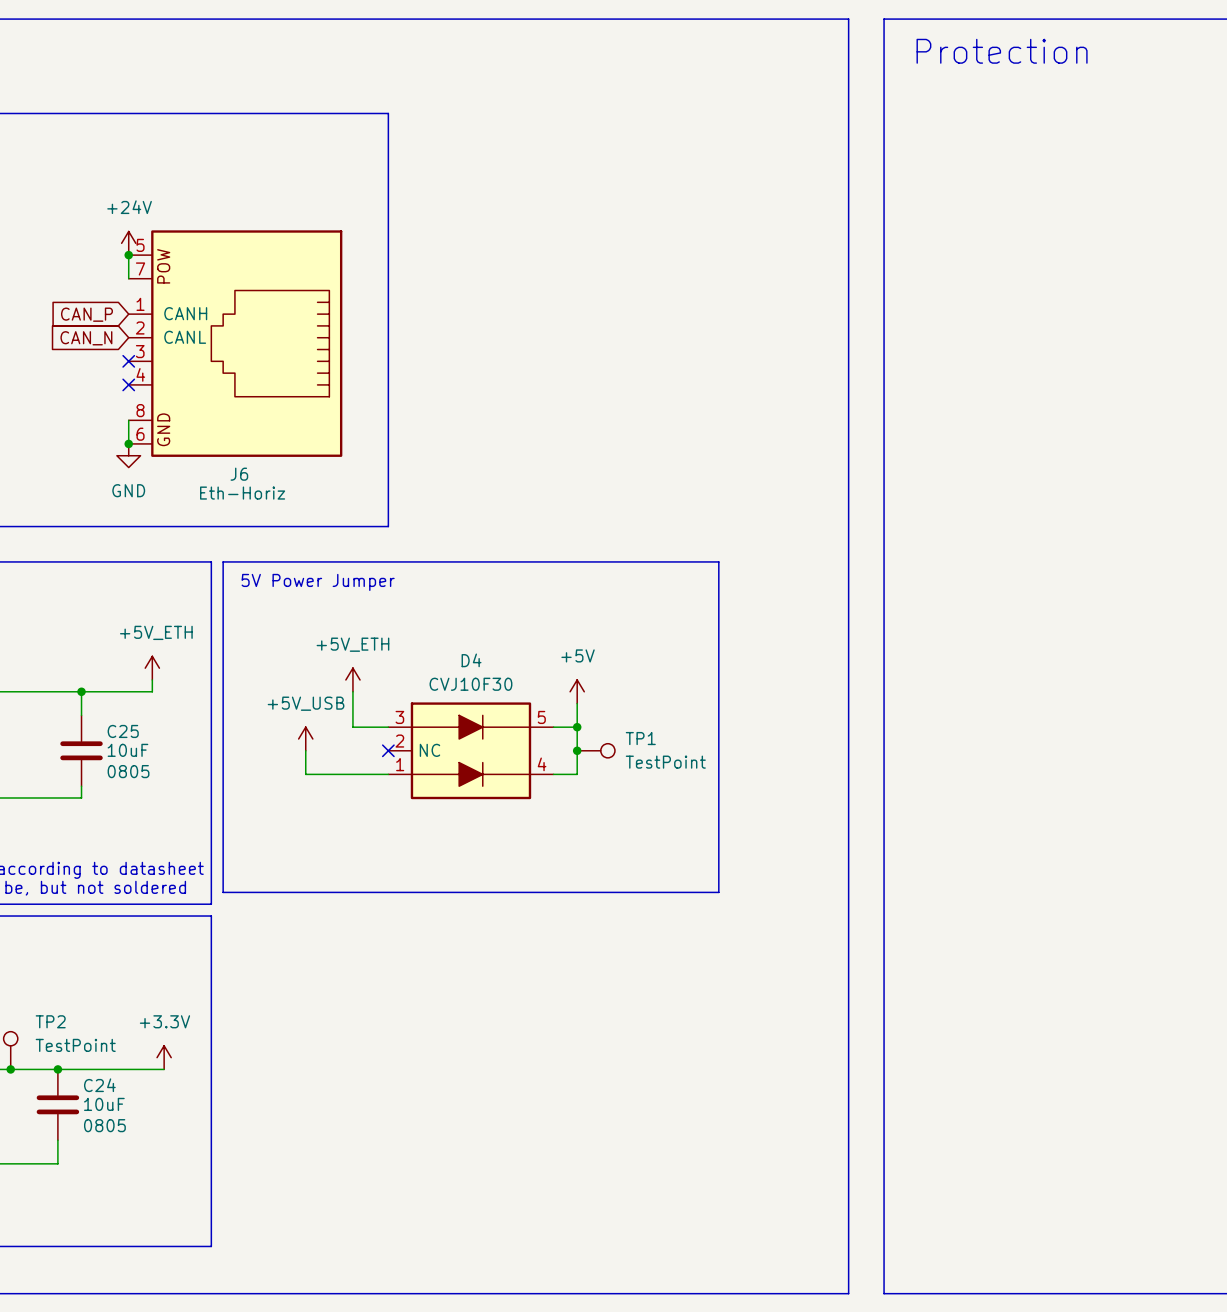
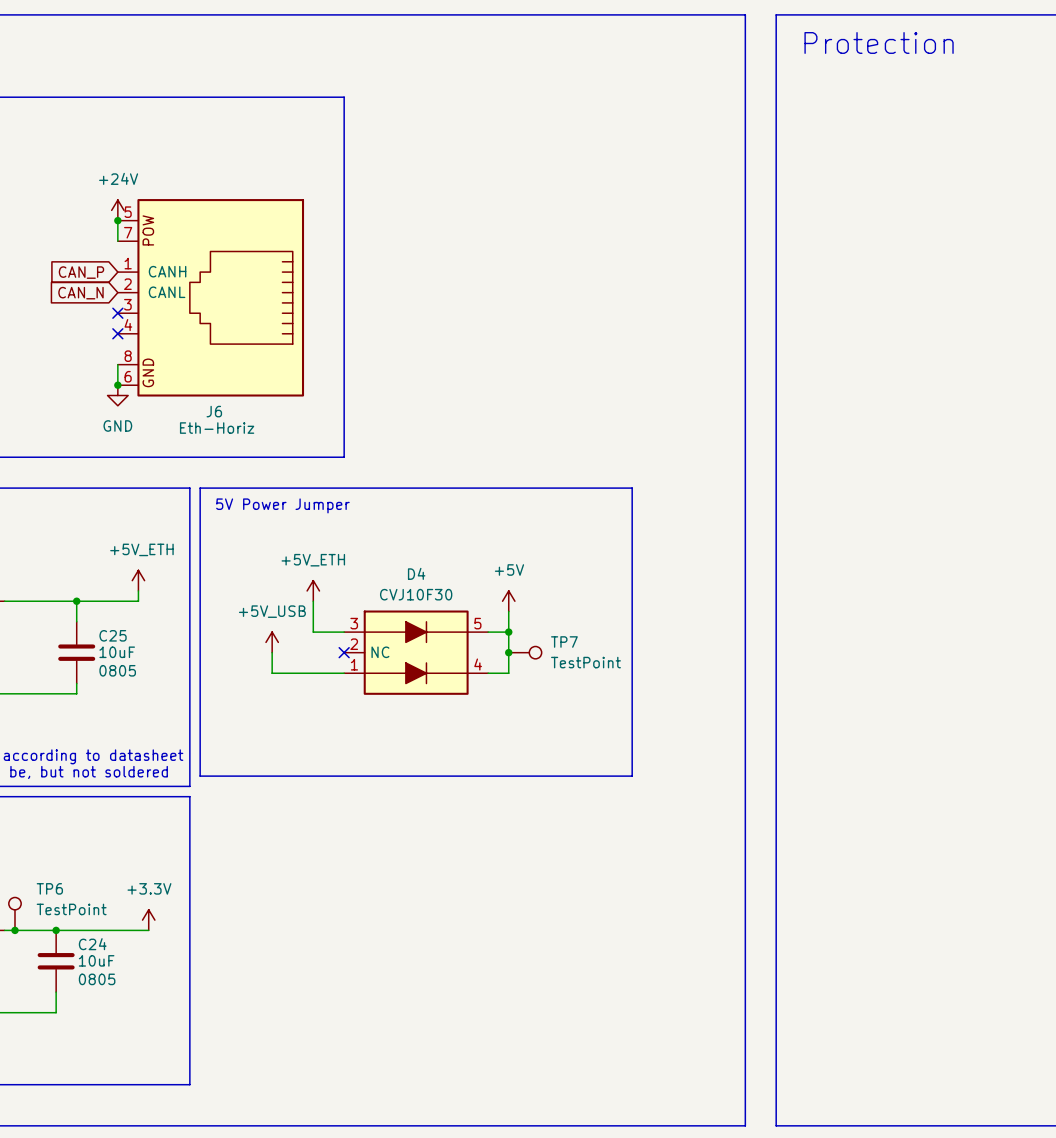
TP1 name: TP1 (640, 738) -> TP7 (564, 642)
TP2 name: TP2 (50, 1021) -> TP6 (49, 888)

